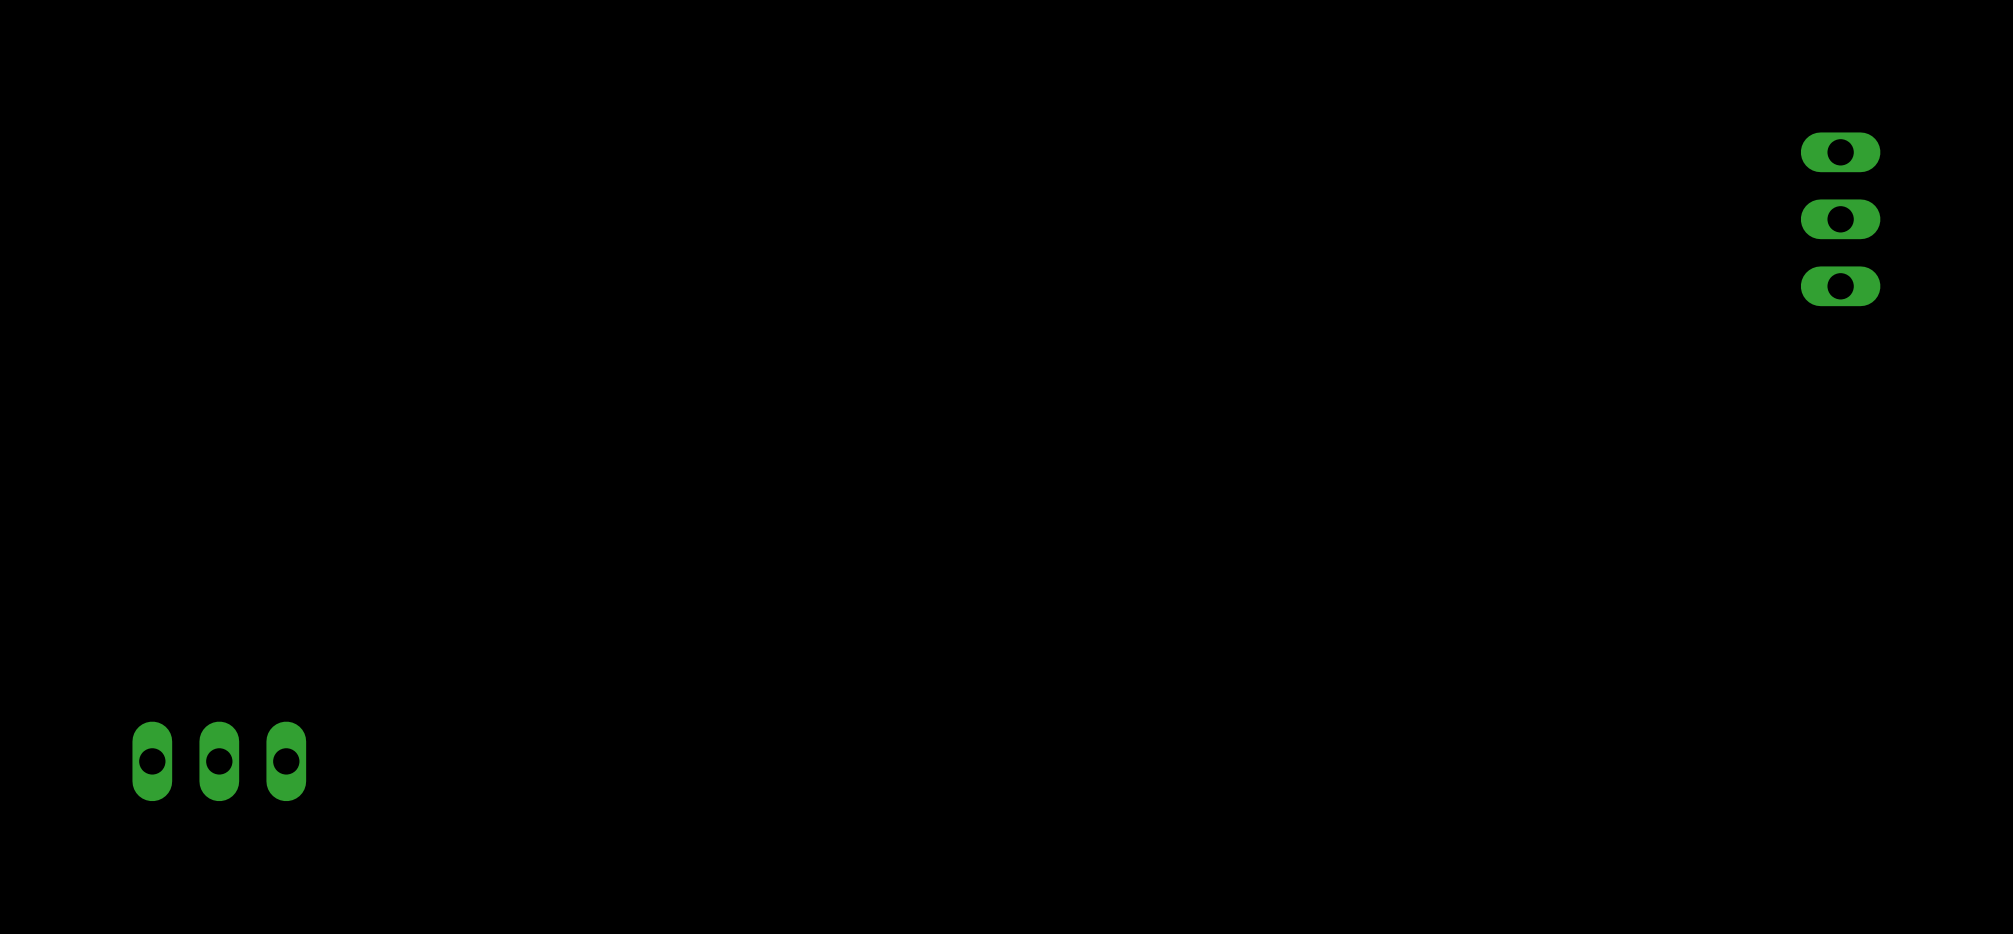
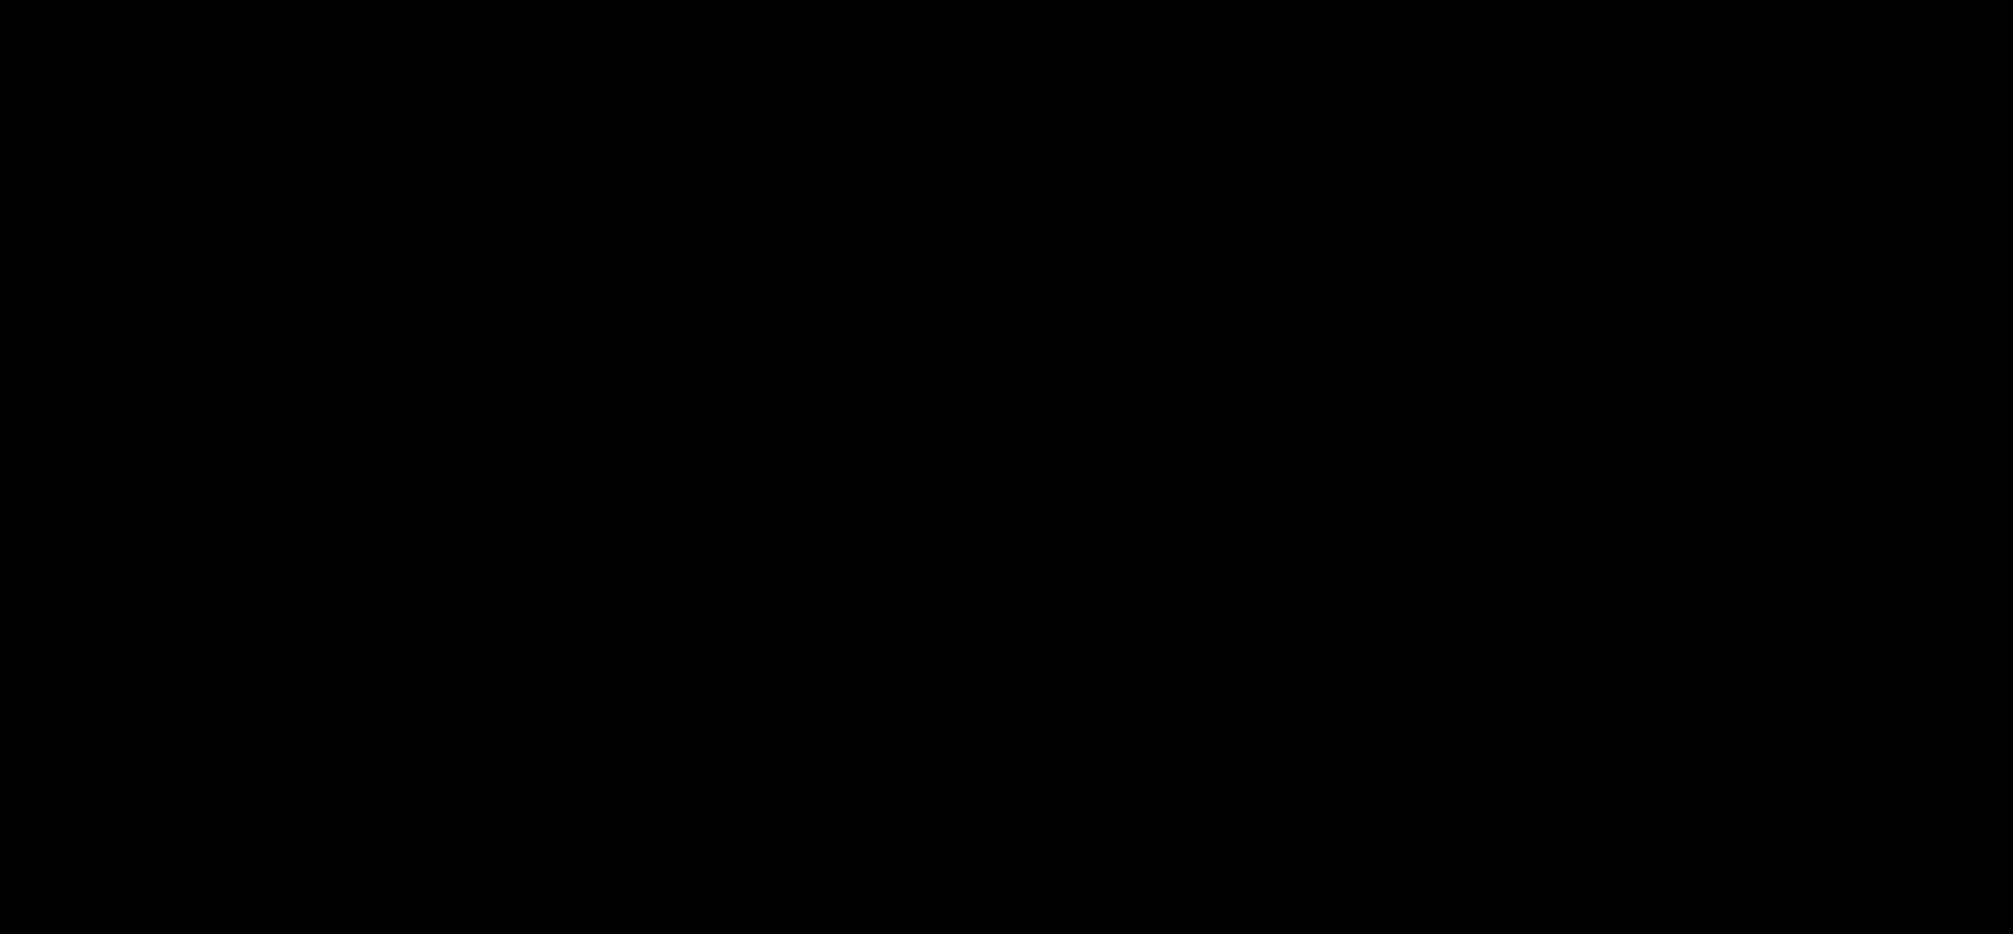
part: (1840, 219) -> none
part: (219, 761) -> none

